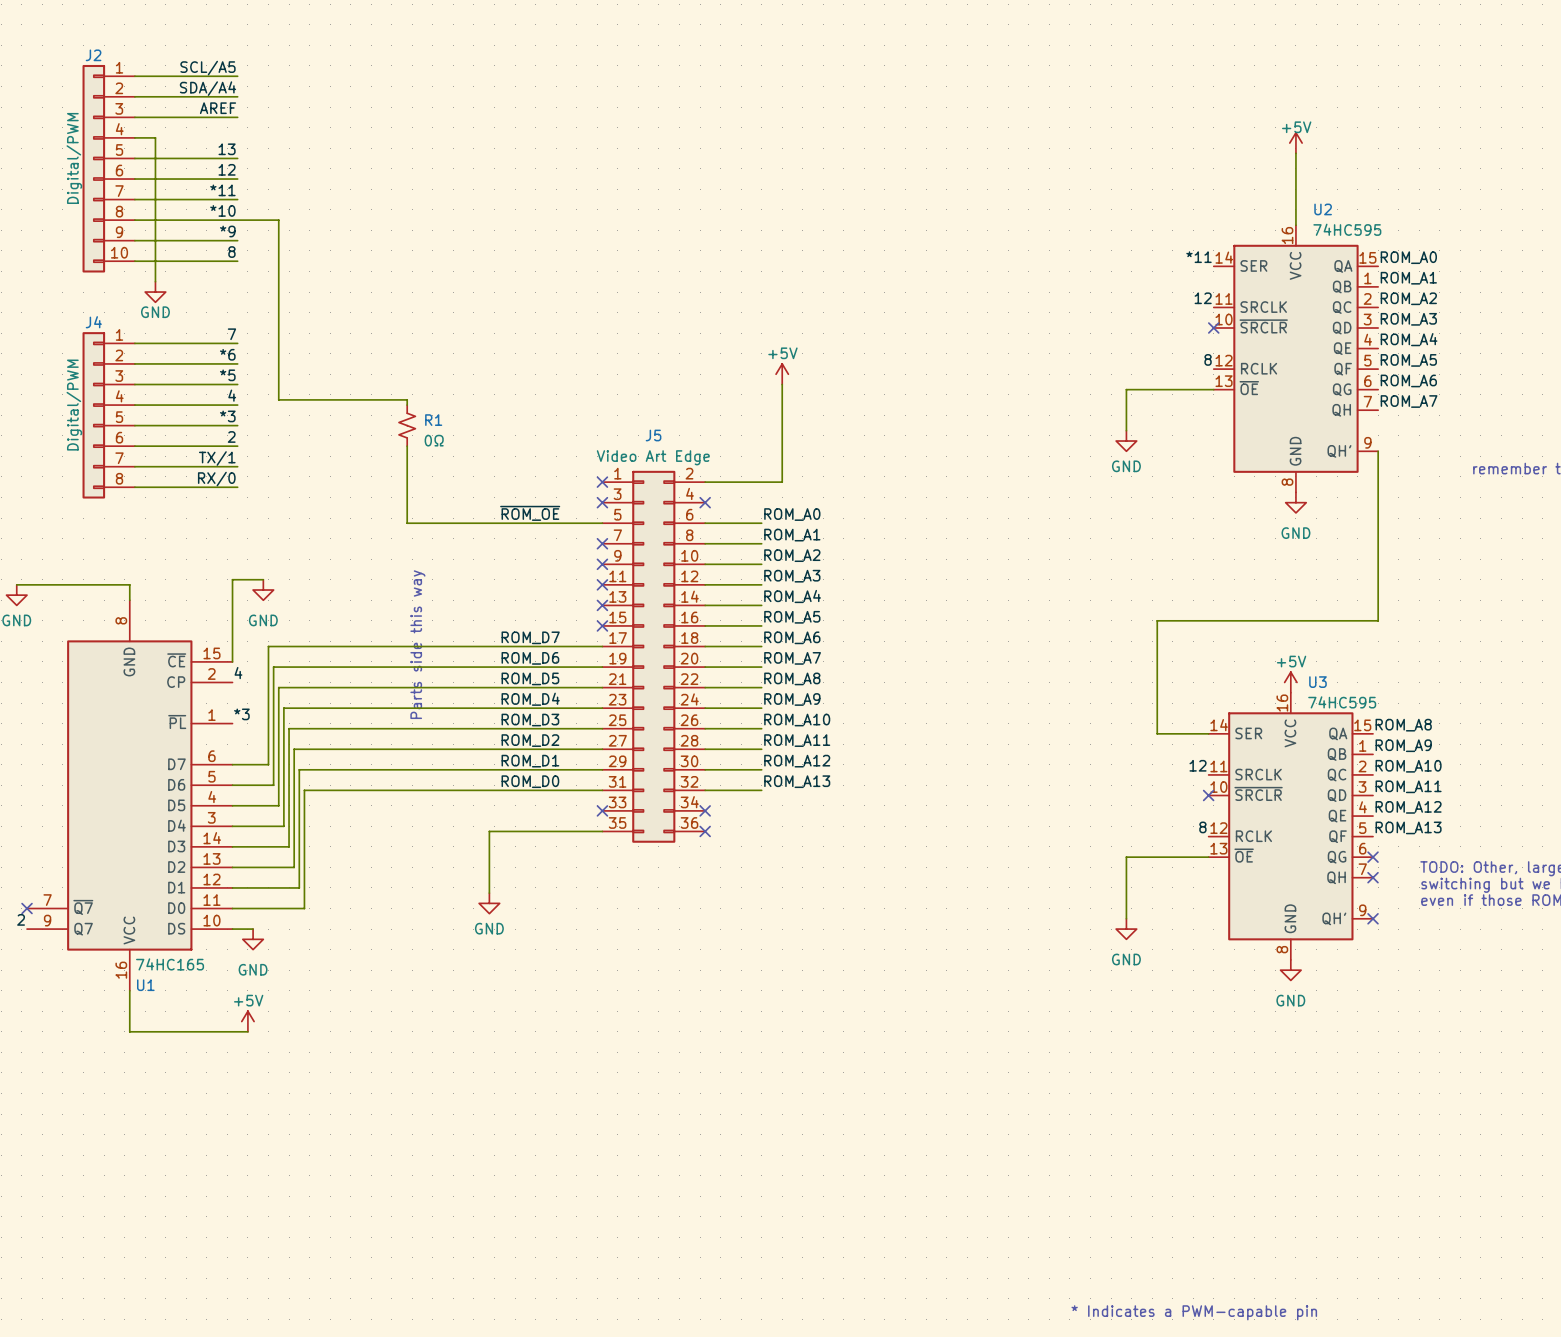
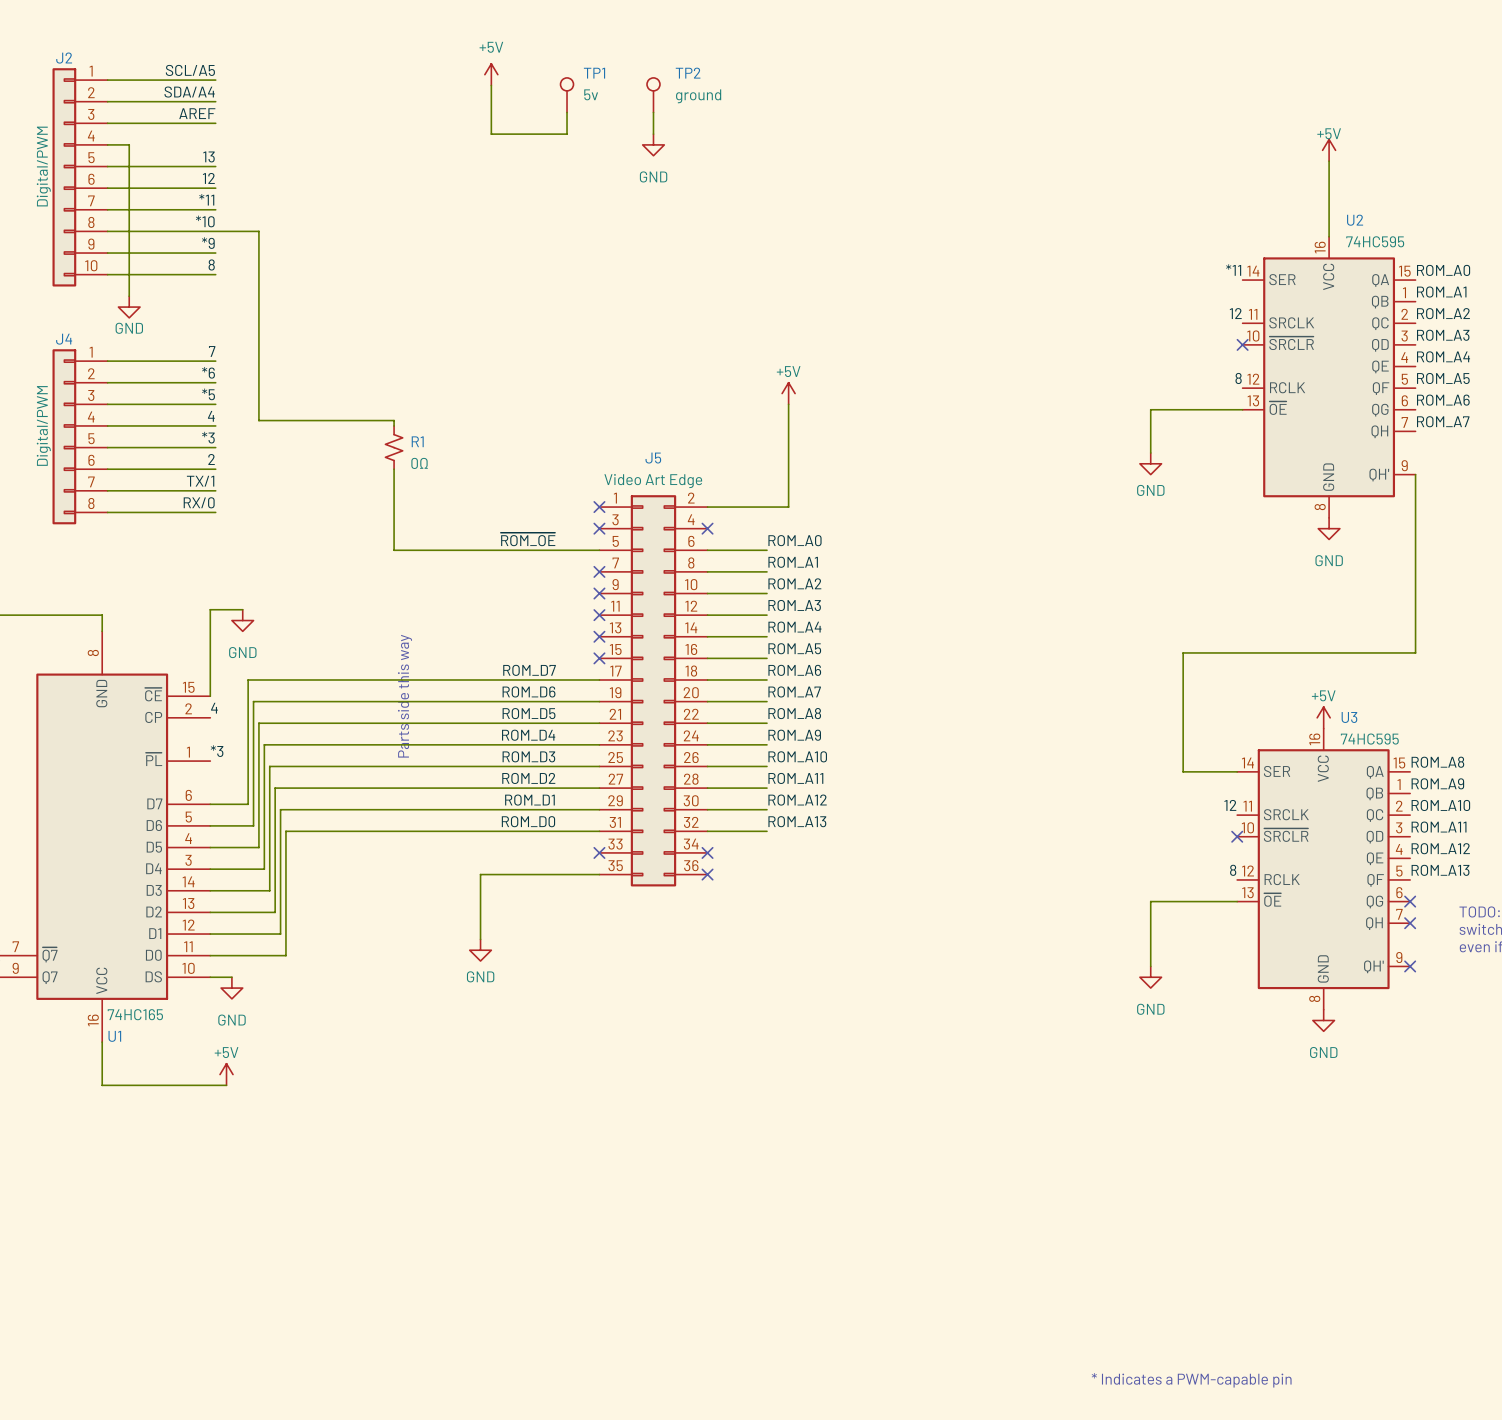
power symbol: none -> +5V (491, 74)
wire: none -> (491, 85) (491, 134) (567, 134) (567, 112)
TP1: none -> 5v (567, 95)
TP2: none -> ground (653, 95)
wire: none -> (653, 112) (653, 134)
power symbol: none -> GND (653, 144)

